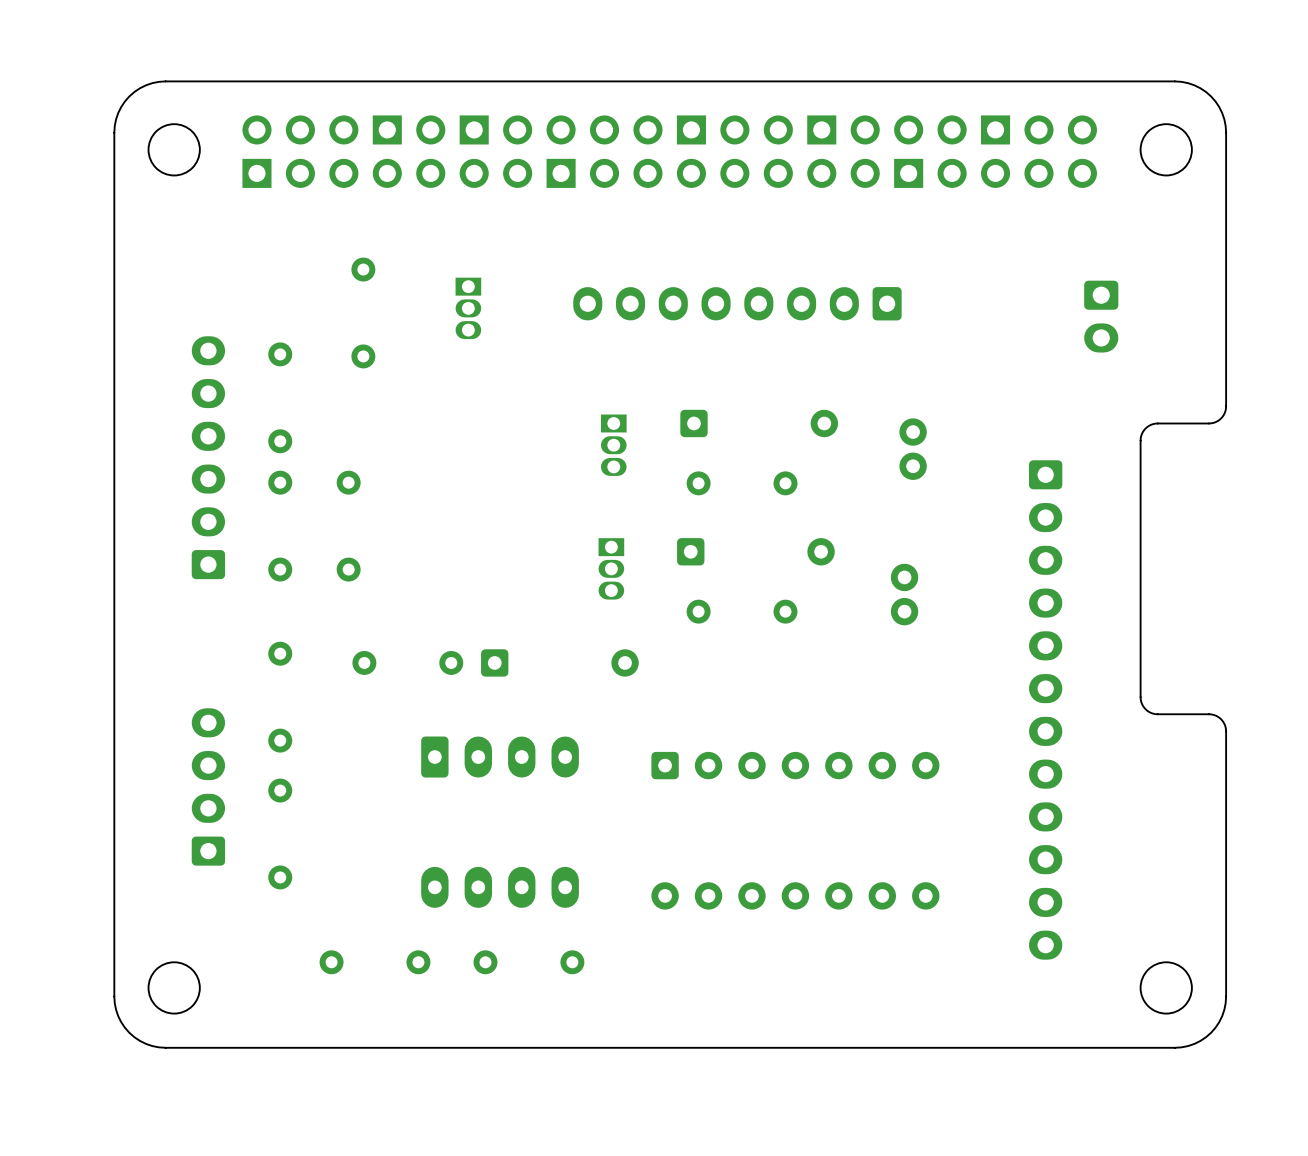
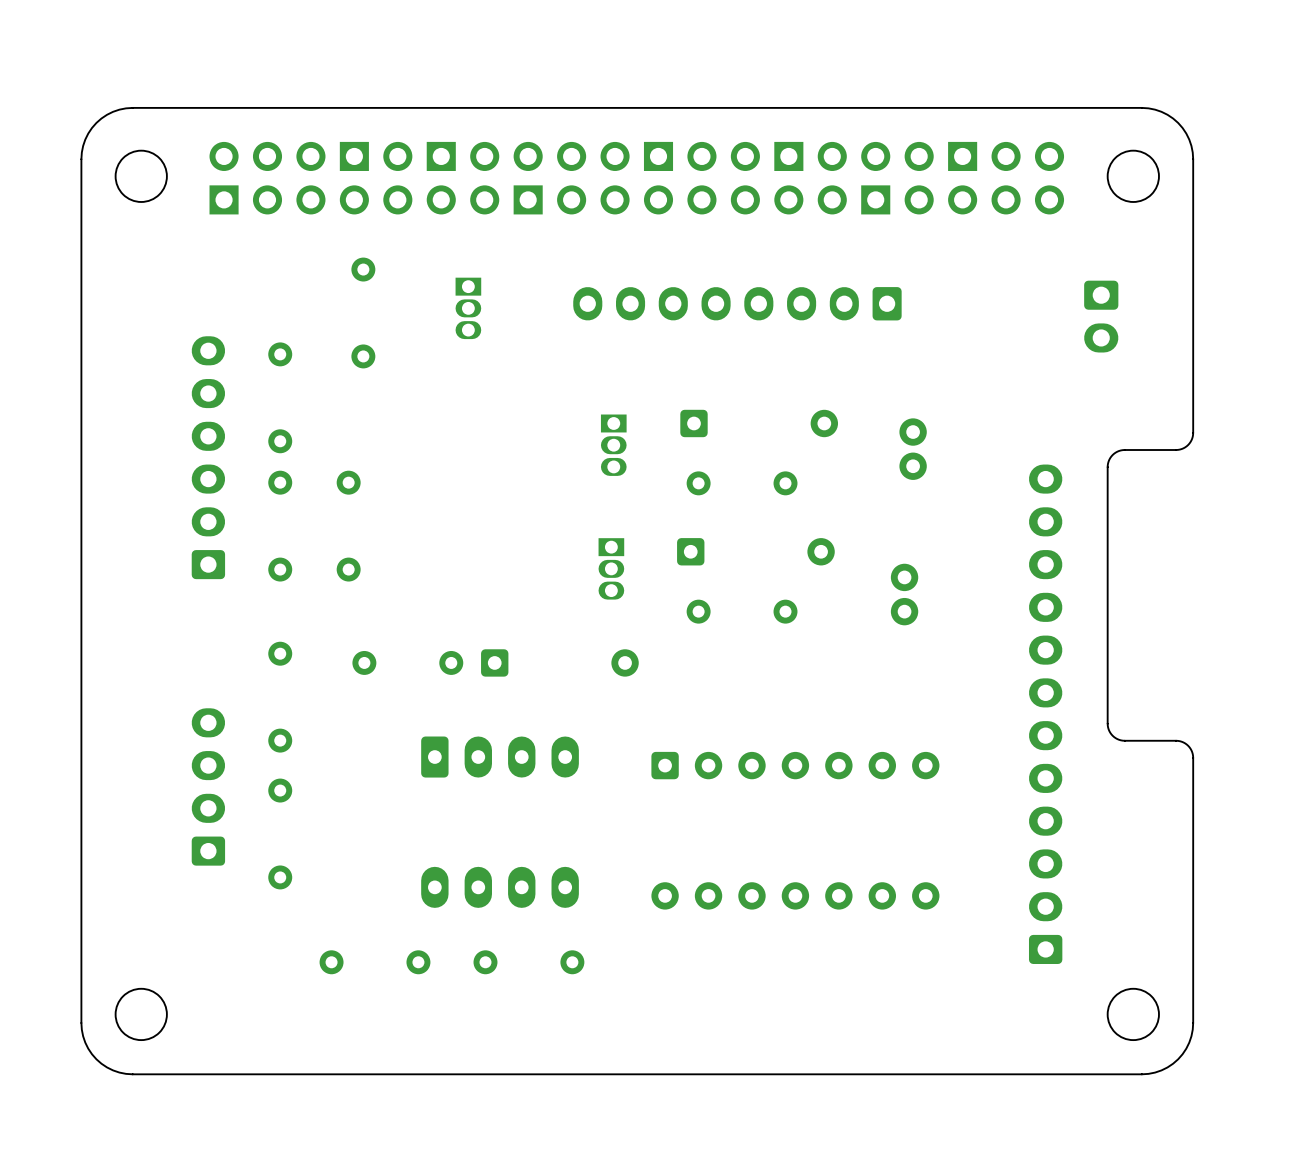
part position: (670, 564) -> (637, 591)
part rotation: 0° (1045, 709) -> 180° (1045, 714)

